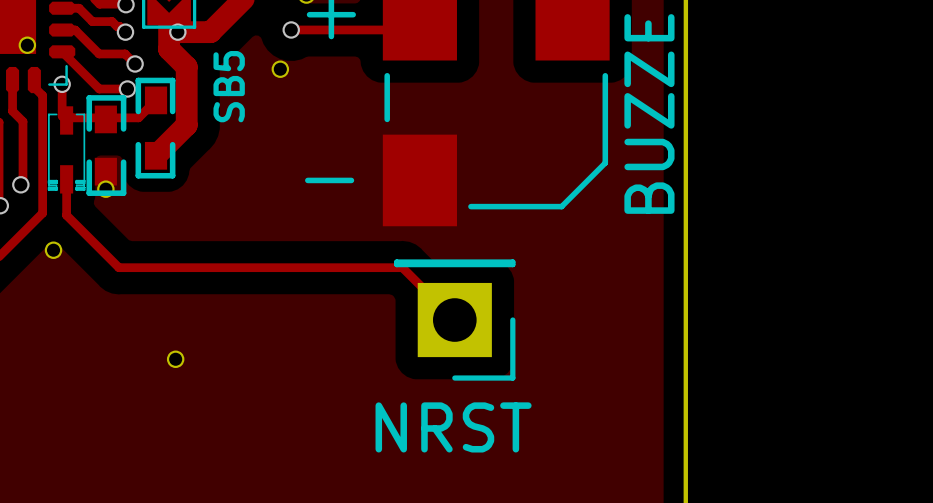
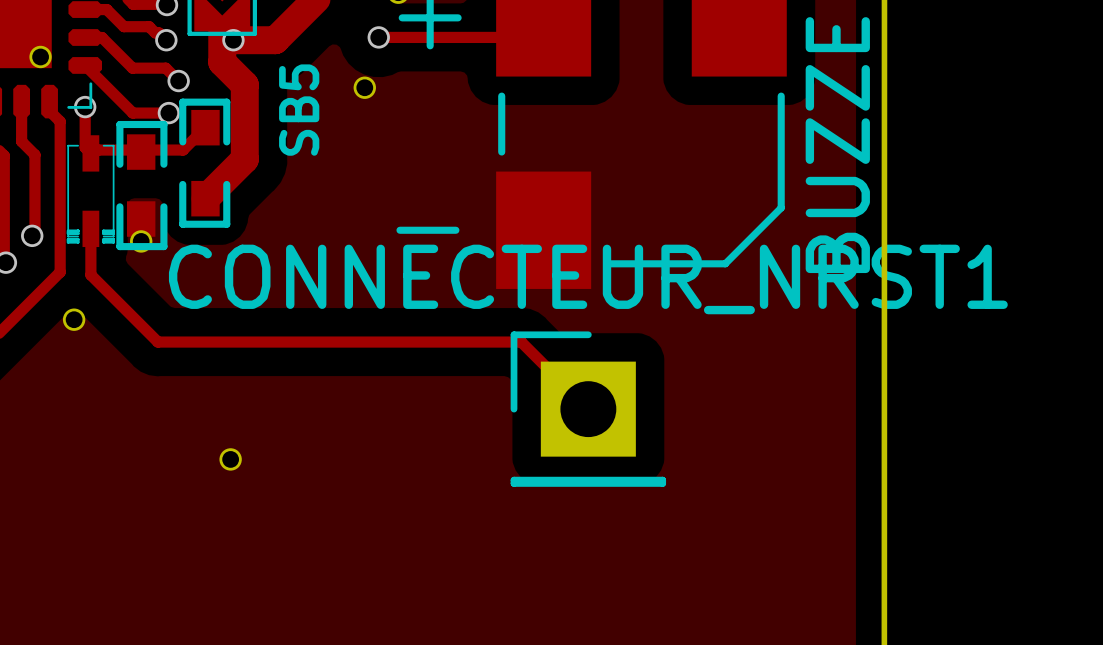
NRST: (454, 320) -> none
CONNECTEUR_NRST1: none -> (588, 409)

